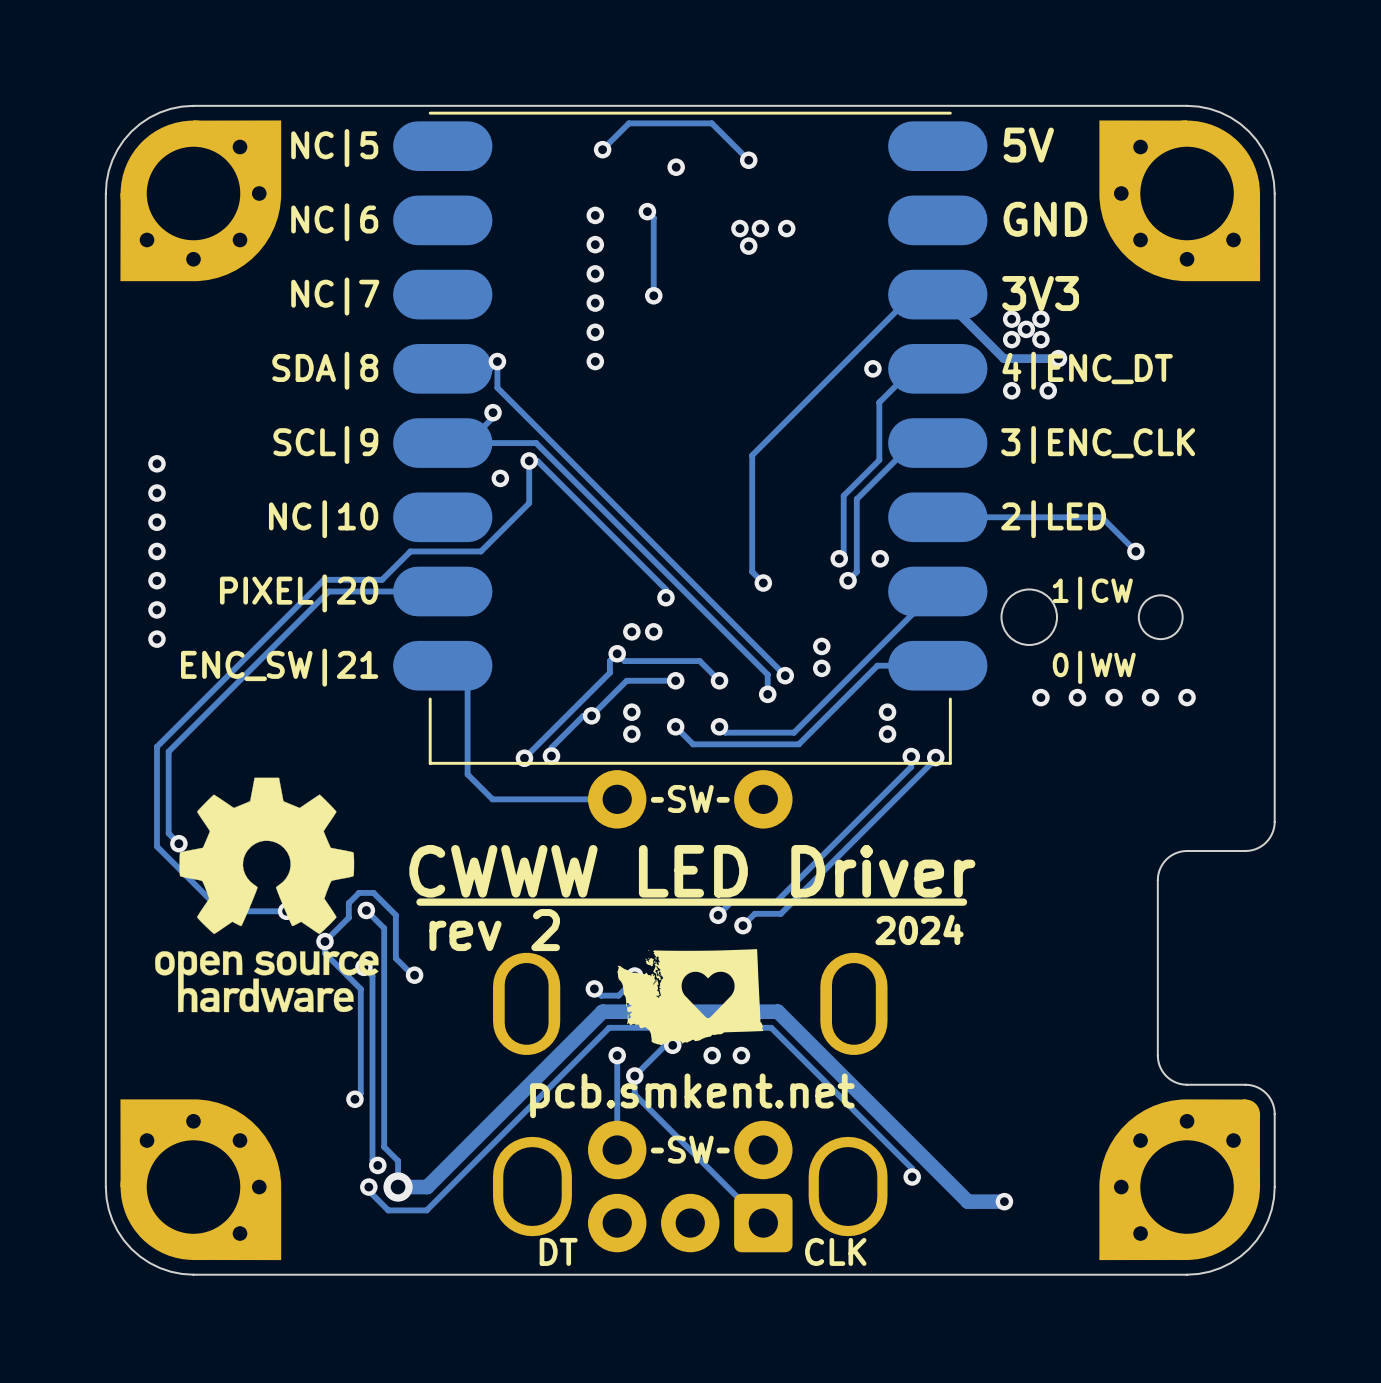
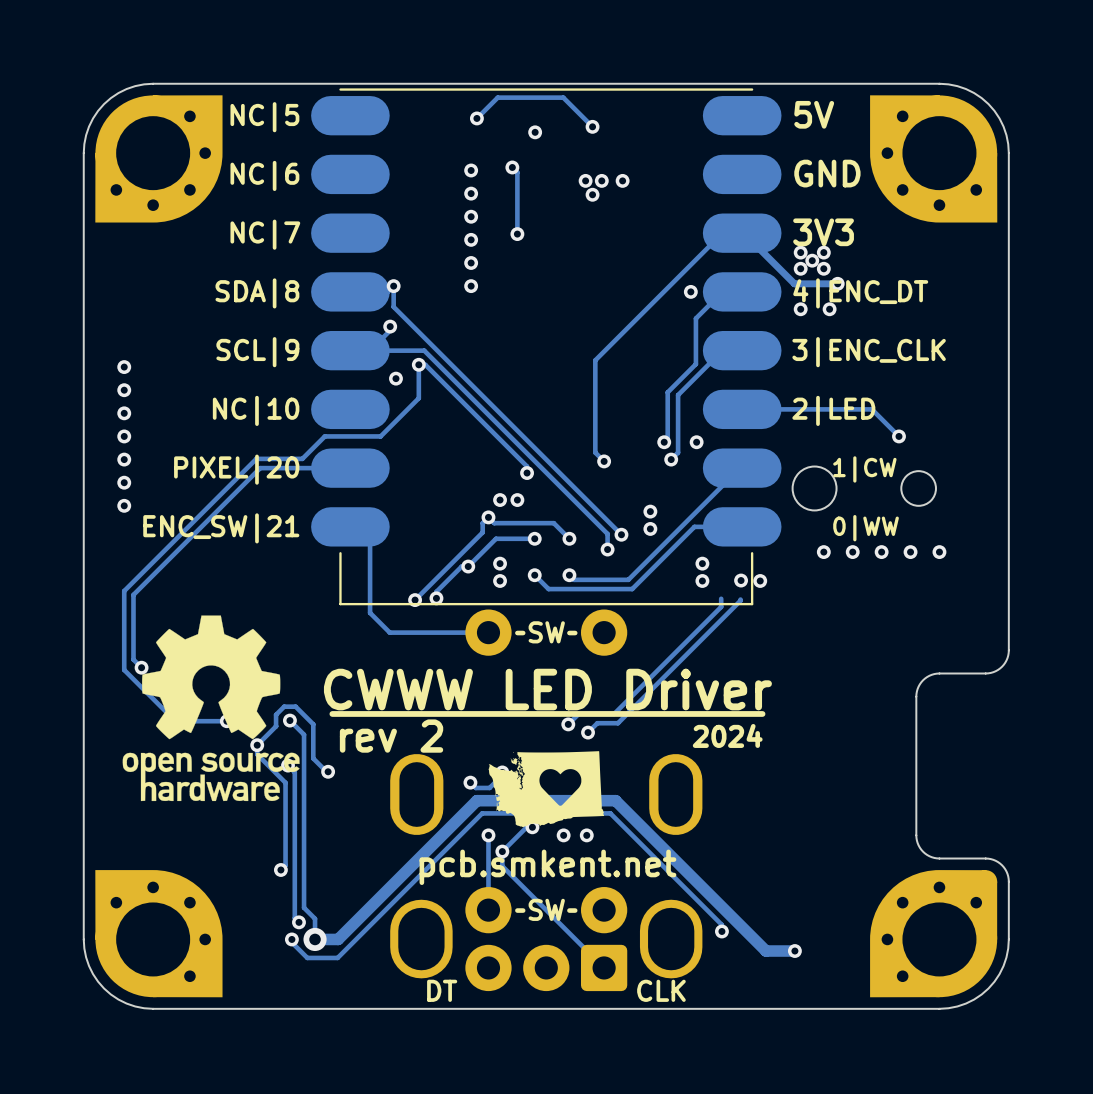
via: none -> (741, 580)
via: none -> (760, 580)
via: (911, 756) -> none
via: (935, 757) -> none

